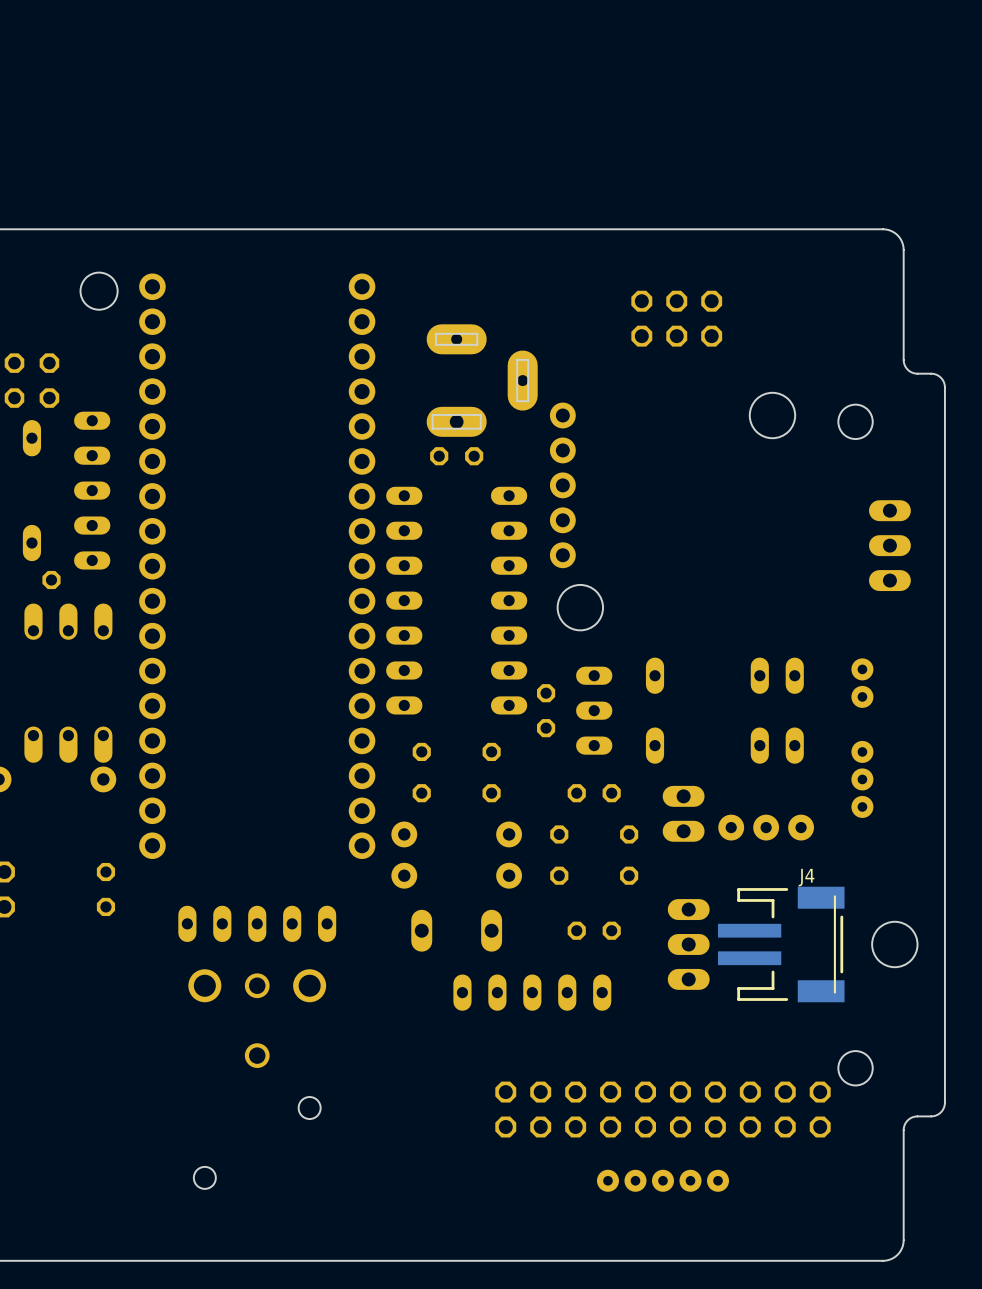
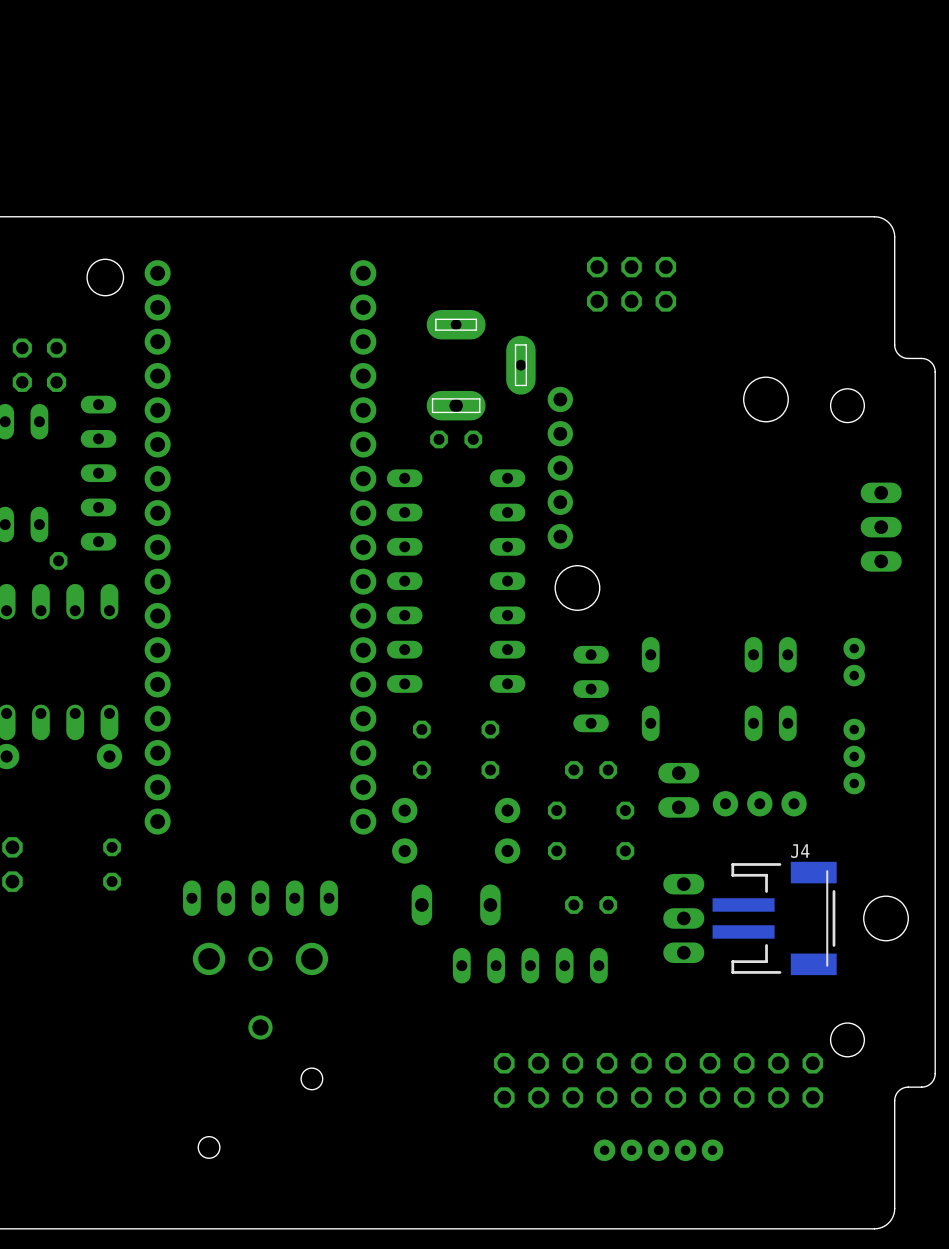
part position: (676, 318) -> (631, 284)
part: (546, 710) -> none

